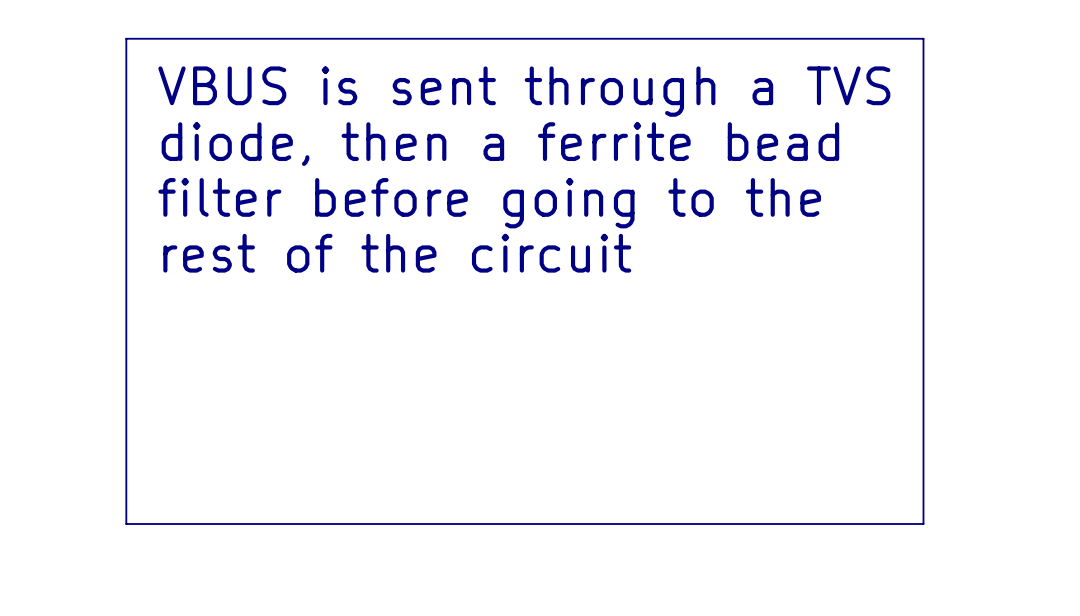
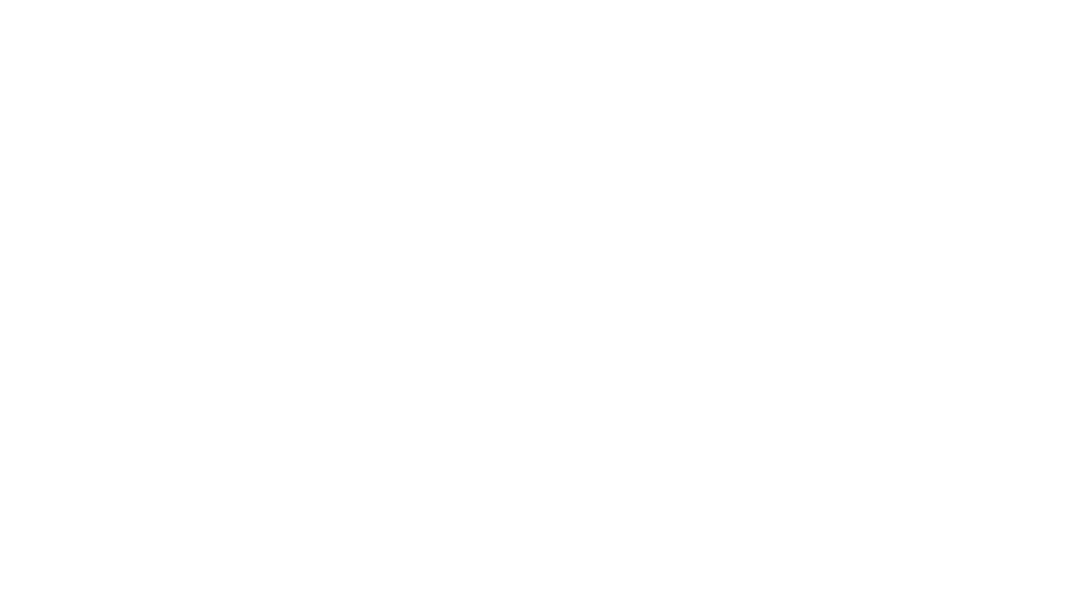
line: (126, 38) (923, 38) (923, 523) (126, 523) (126, 38) -> none
text: VBUS is sent through a TVS (524, 91) -> none
text: diode, then a ferrite bead (500, 144) -> none
text: filter before going to the (489, 203) -> none
text: rest of the circuit (397, 253) -> none

